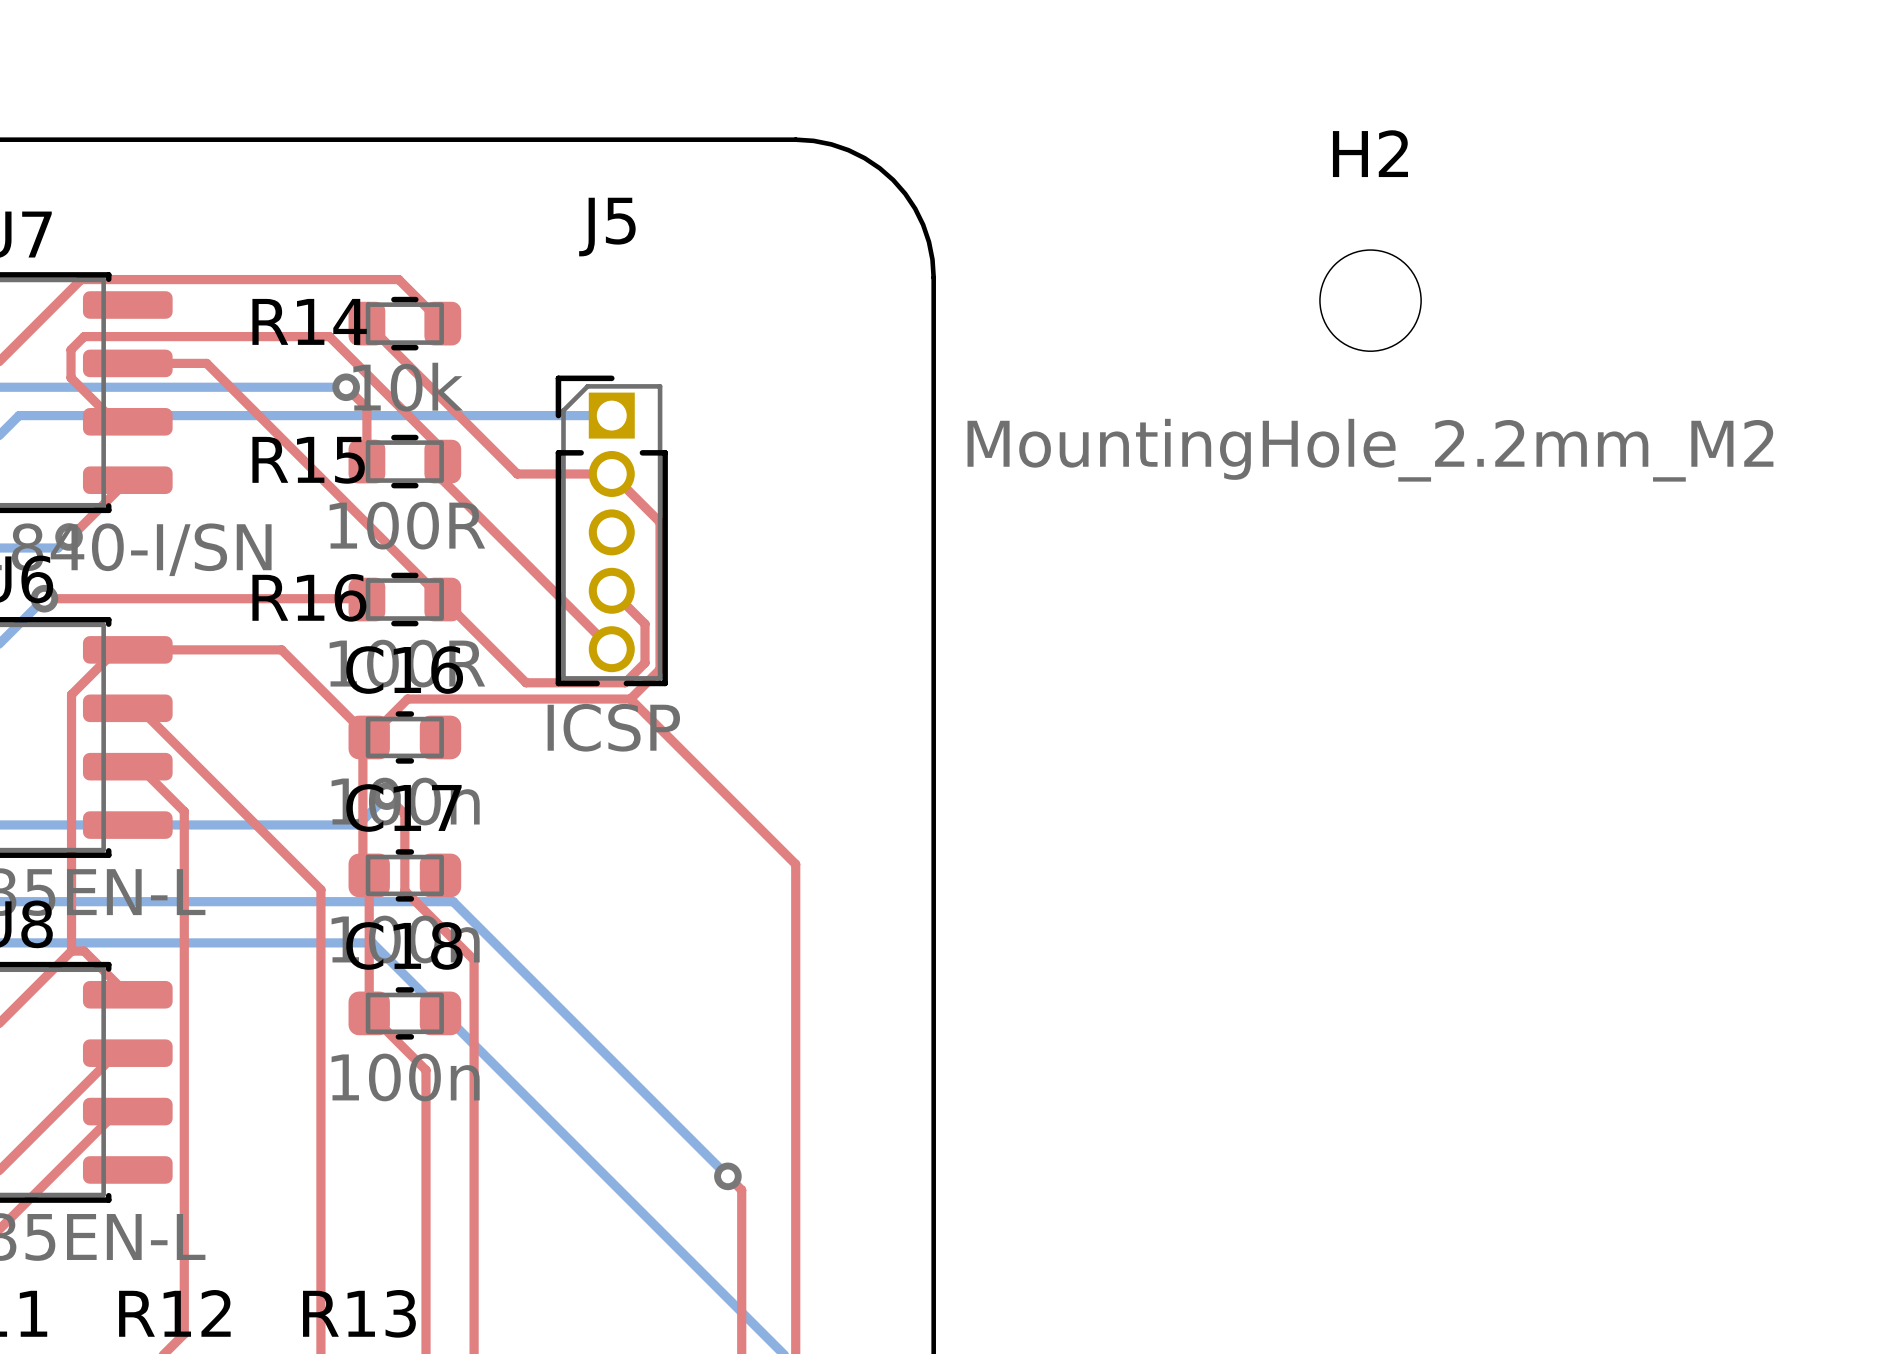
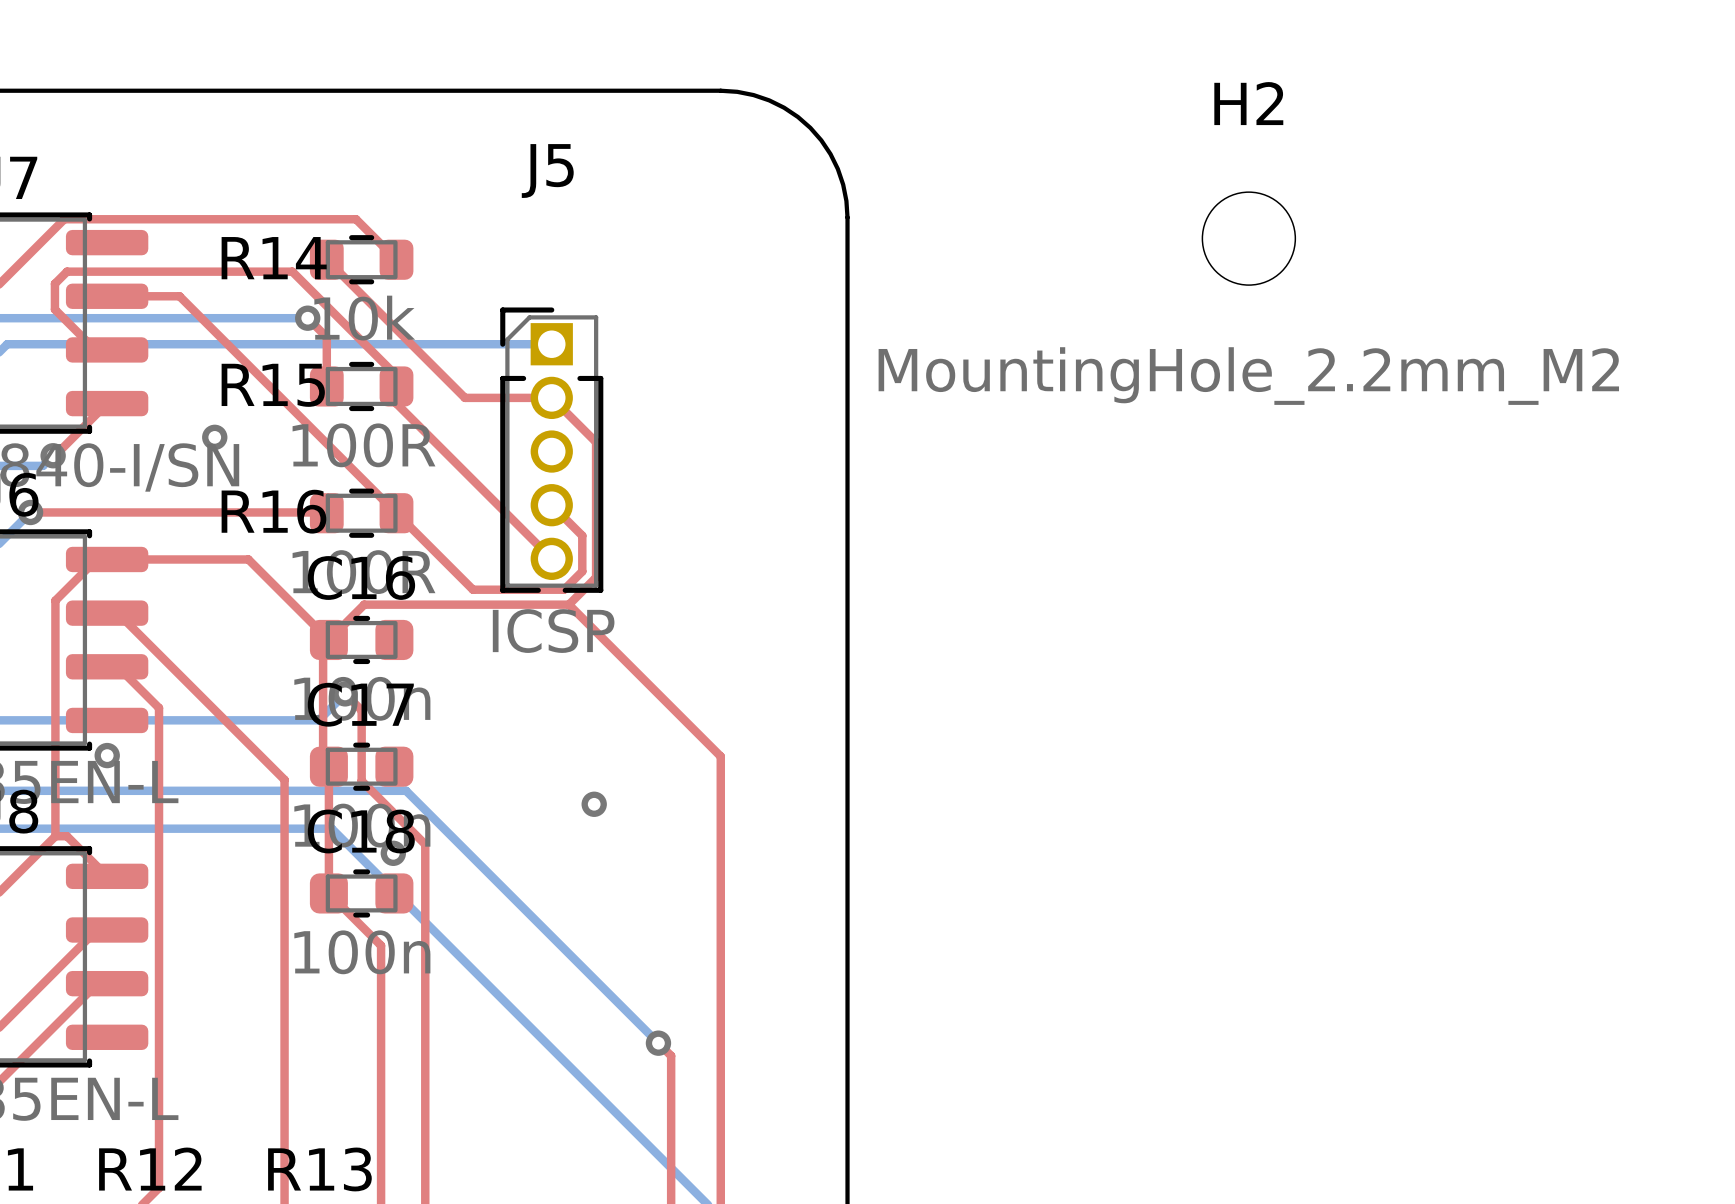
via: none -> (214, 437)
via: none -> (107, 755)
via: none -> (594, 804)
via: none -> (393, 853)

